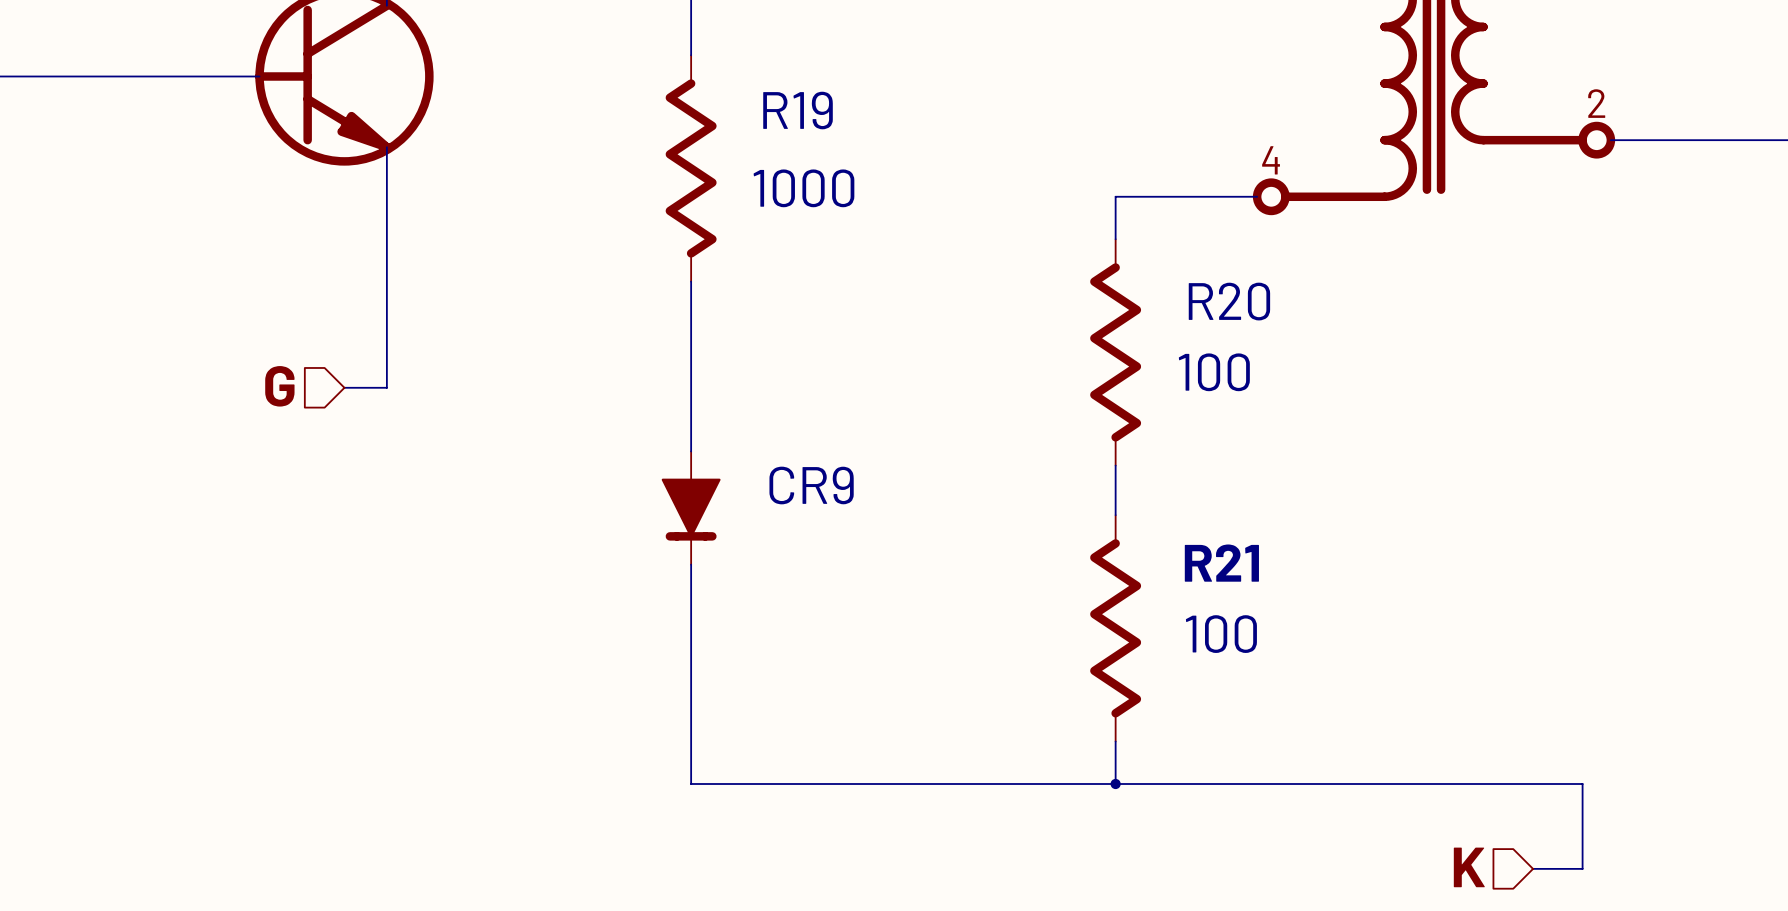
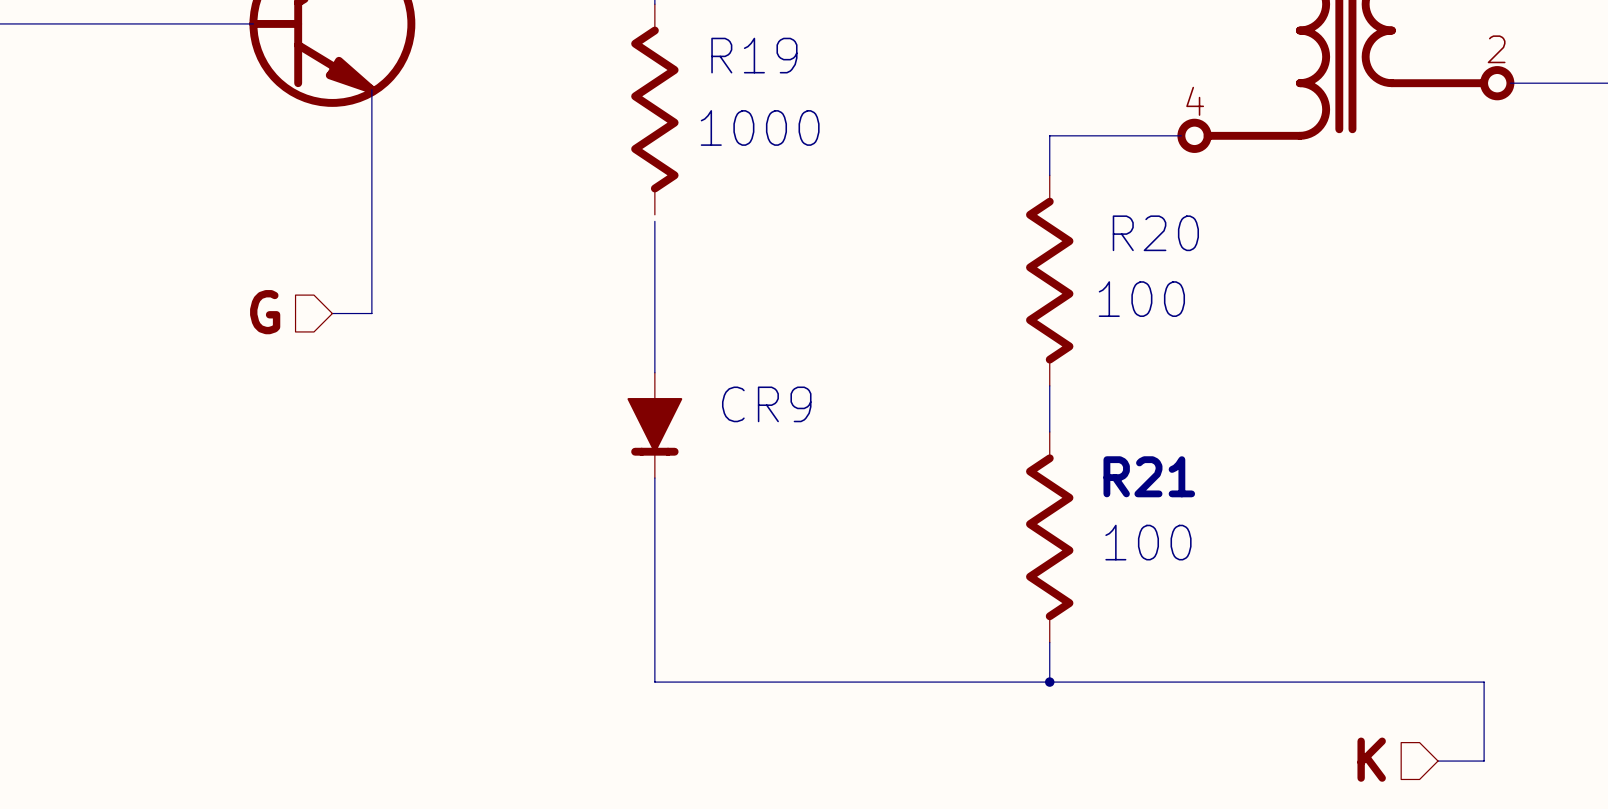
wire: (691, 281) (691, 288) -> none

